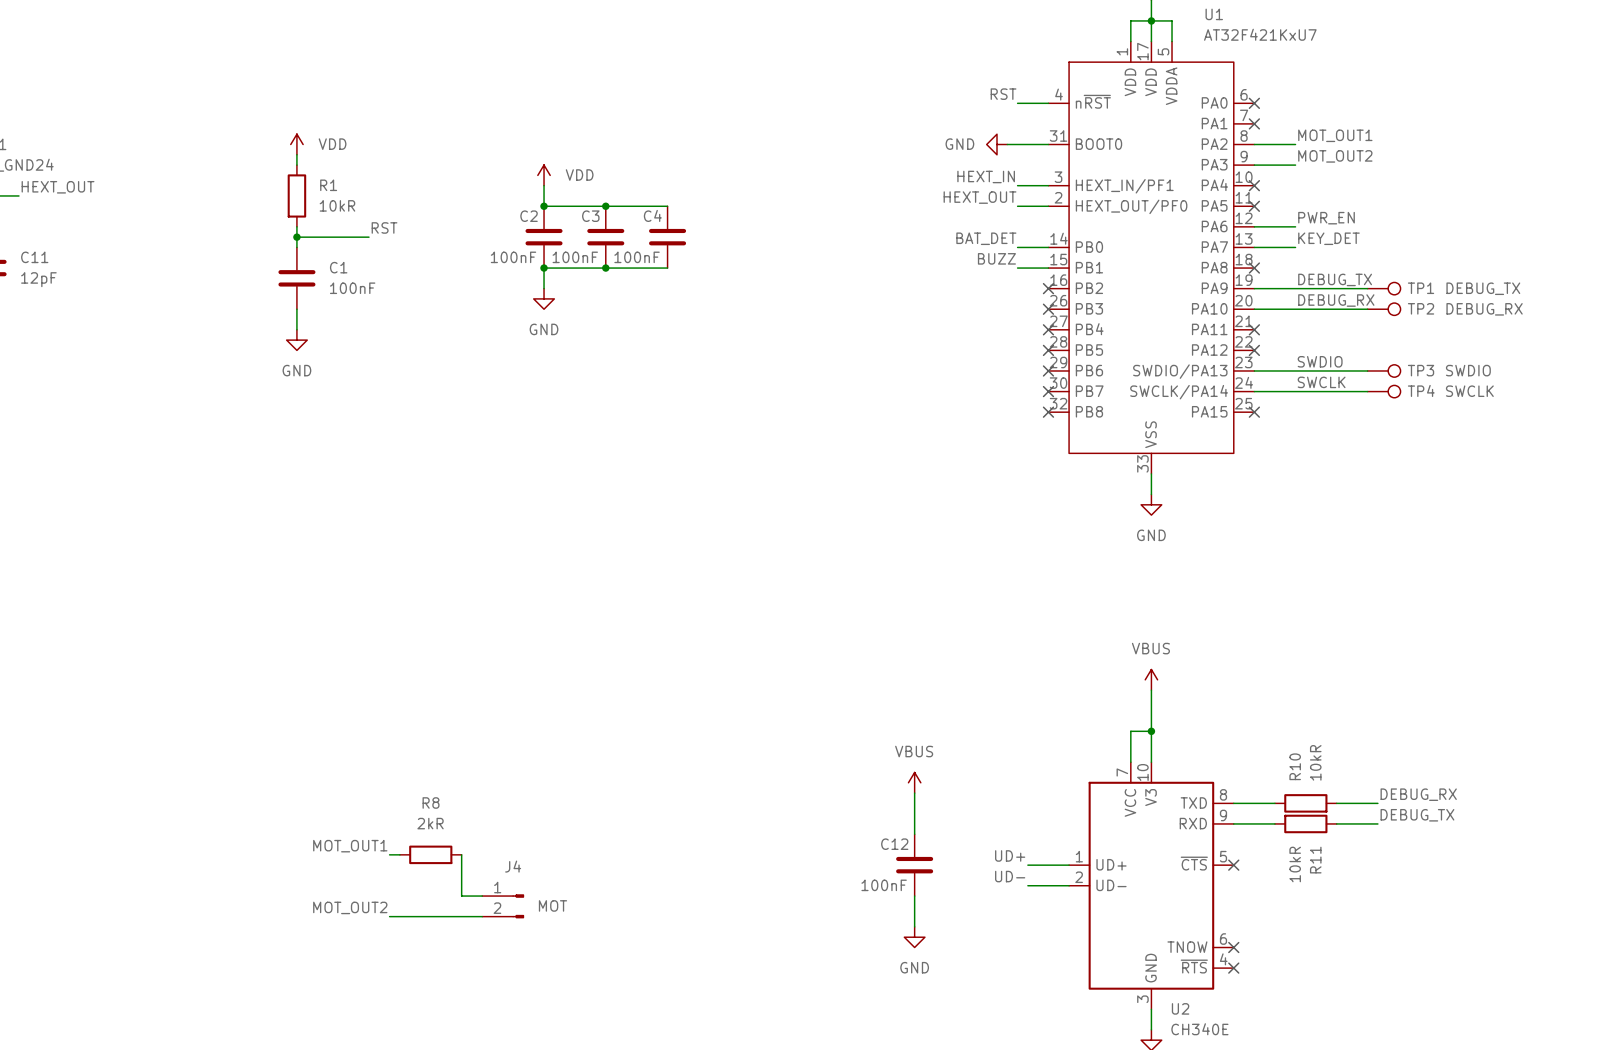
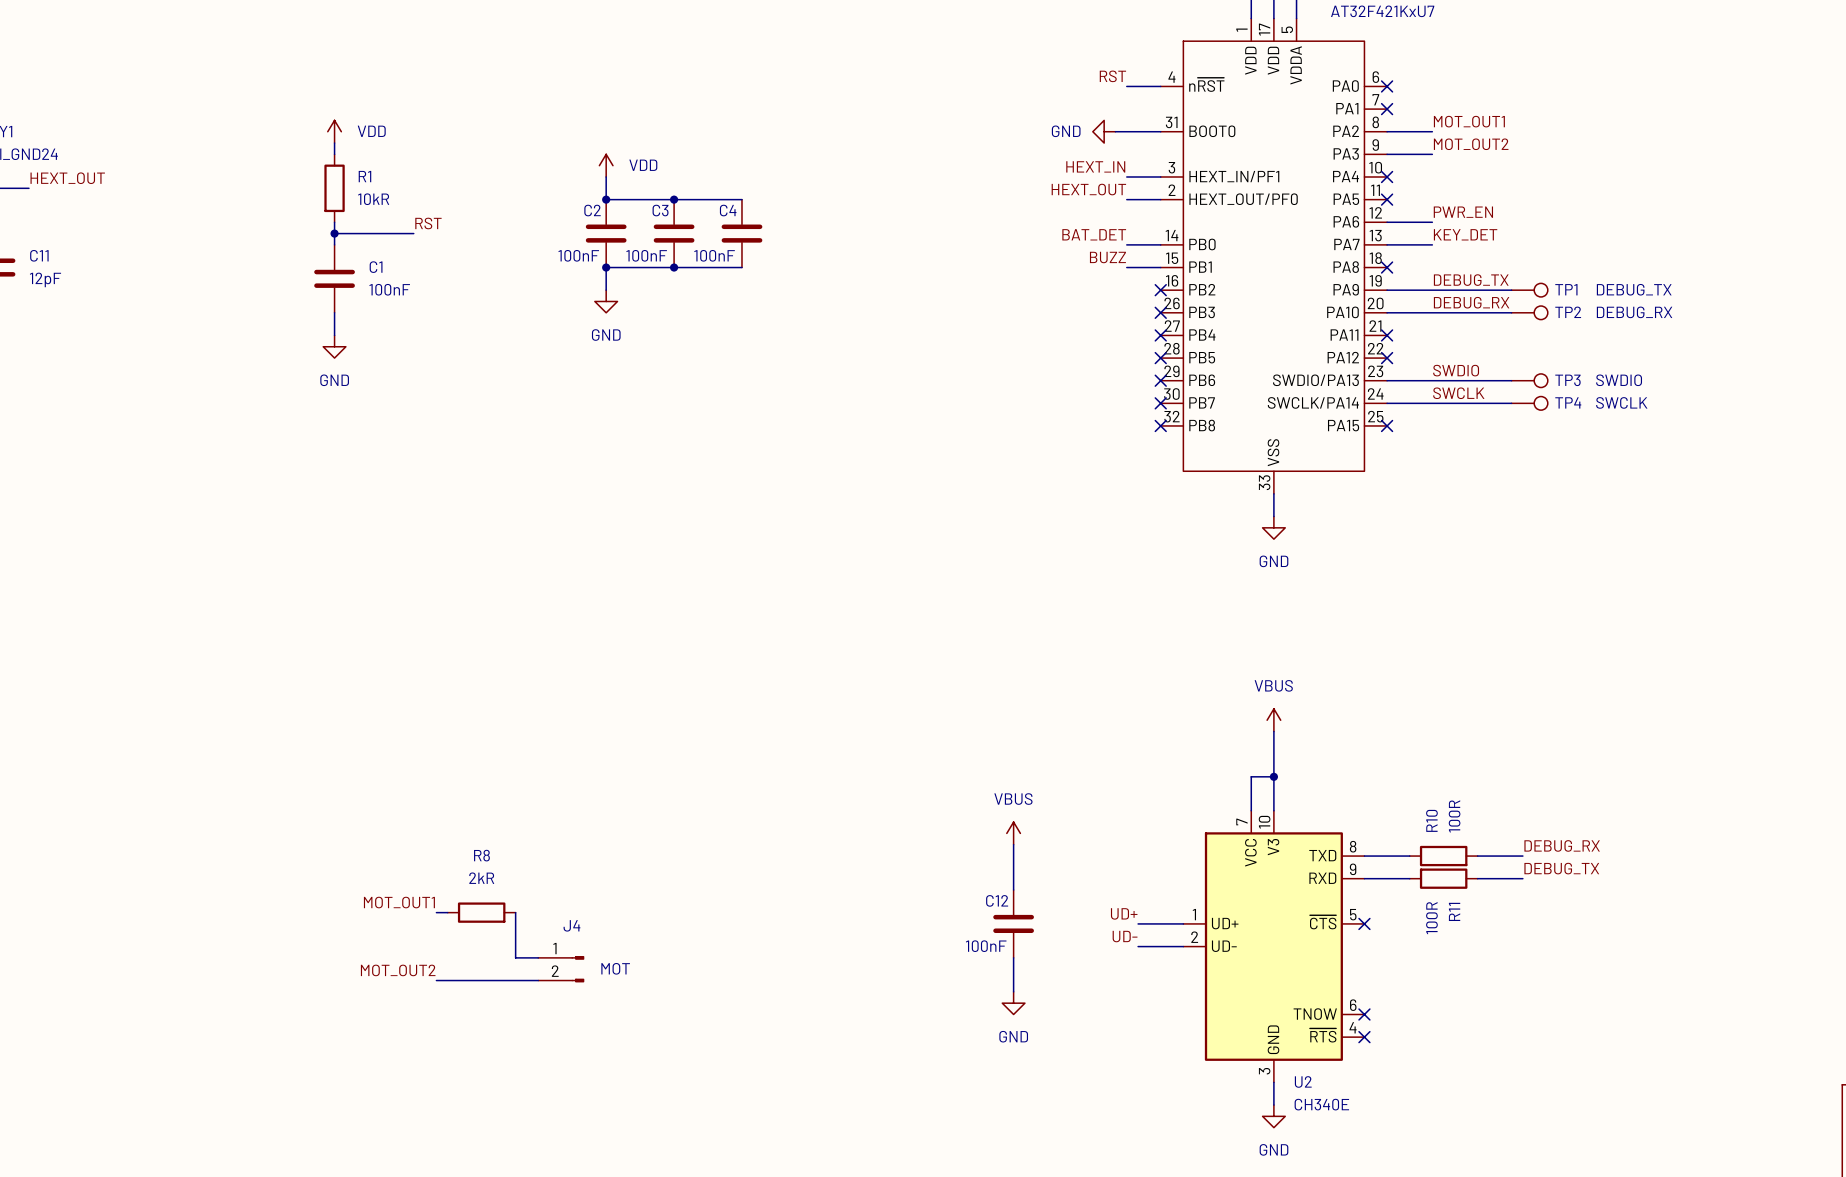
R10 value: 10kR (1315, 762) -> 100R (1454, 816)
R11 value: 10kR (1295, 864) -> 100R (1431, 918)

